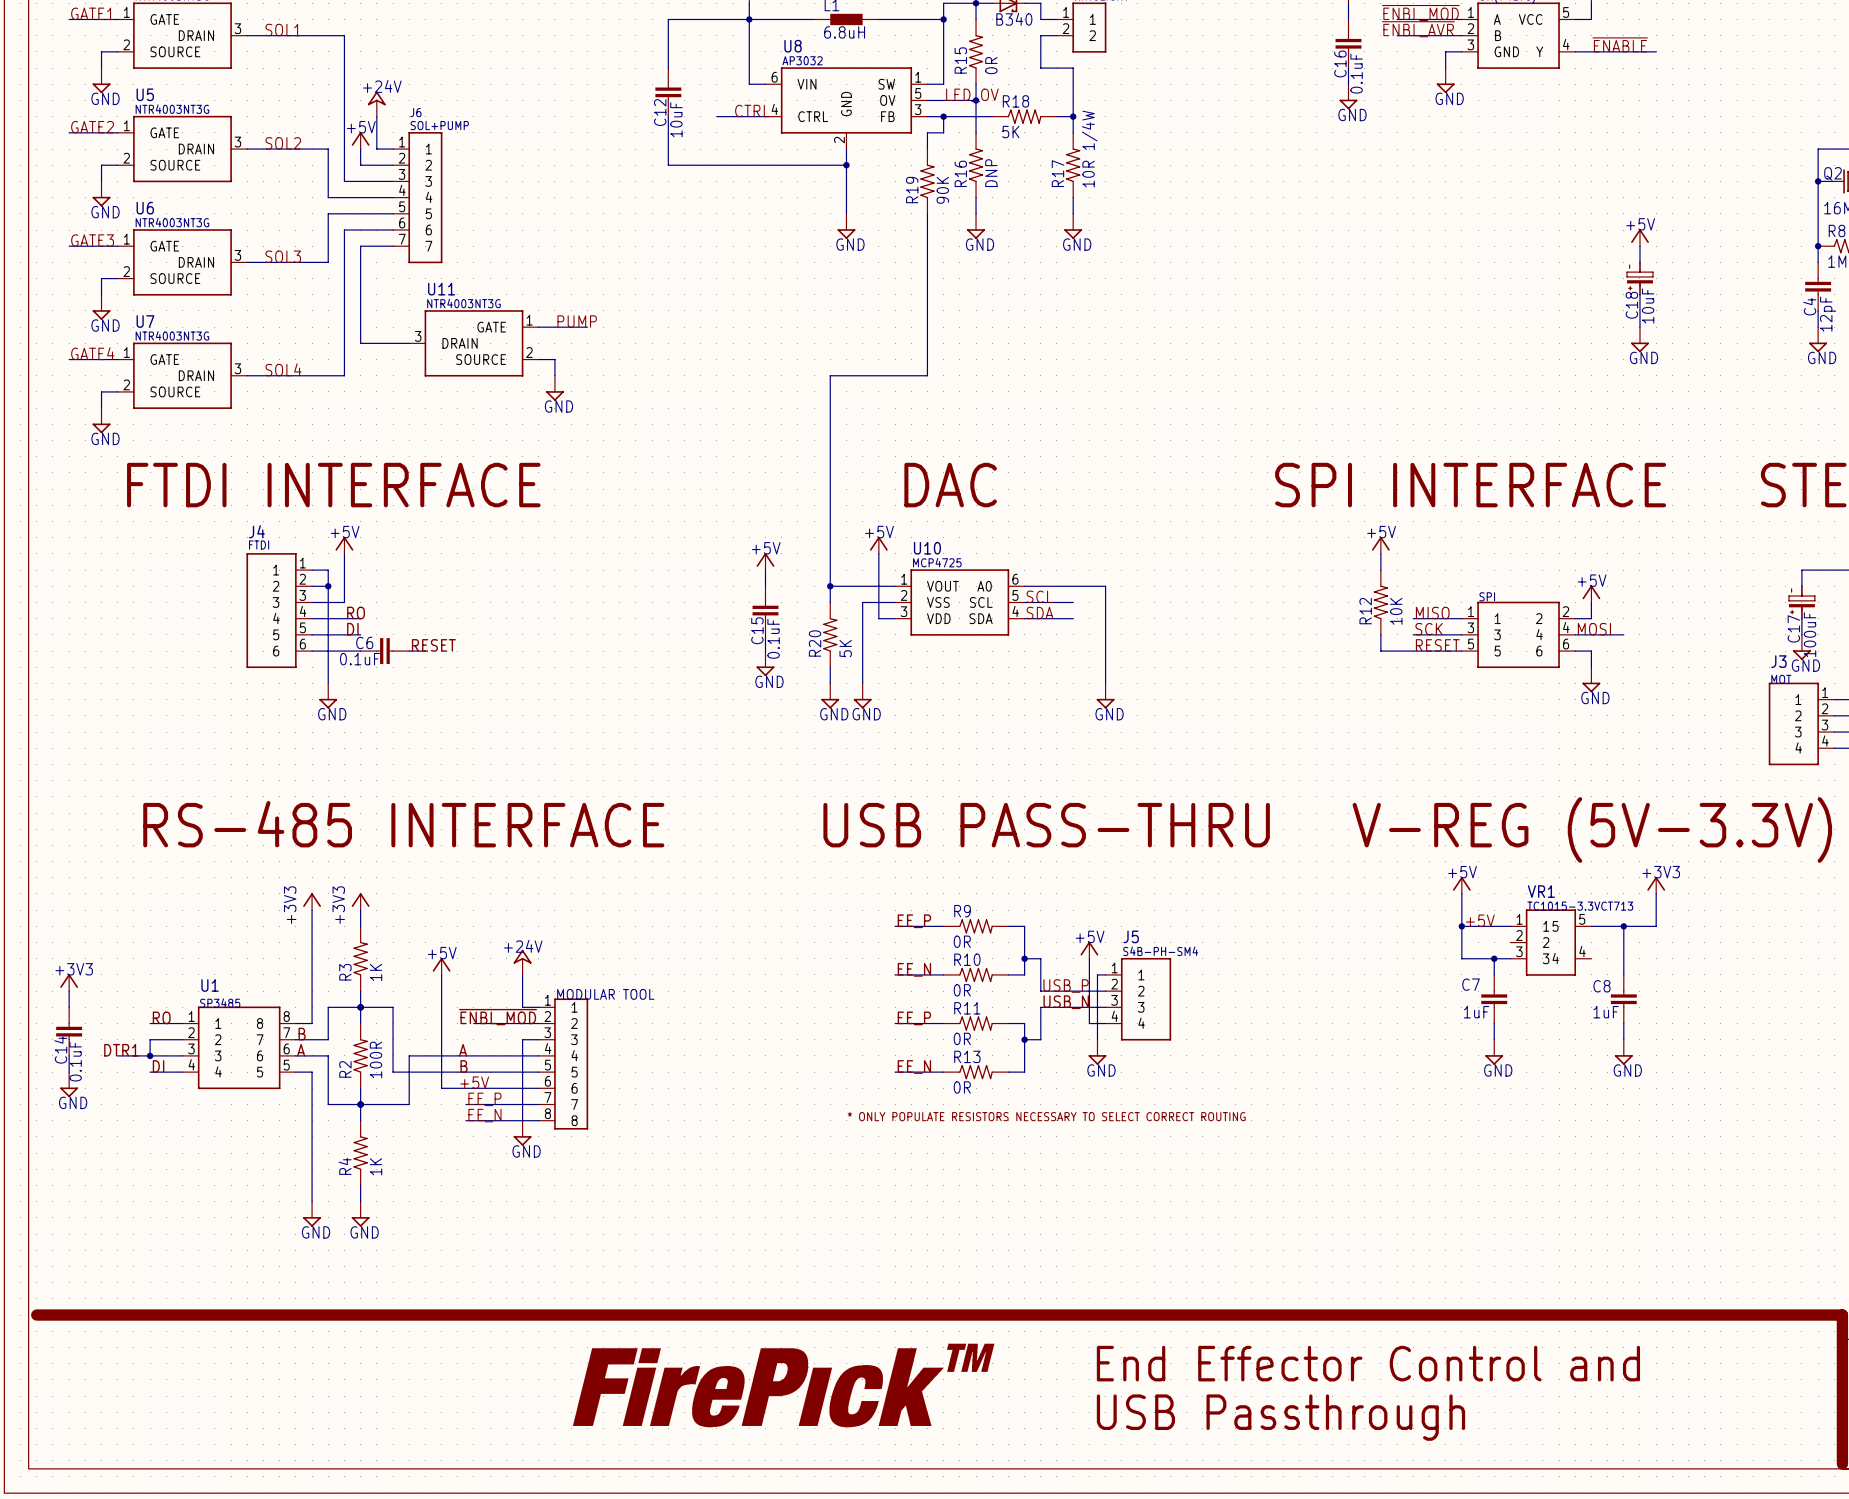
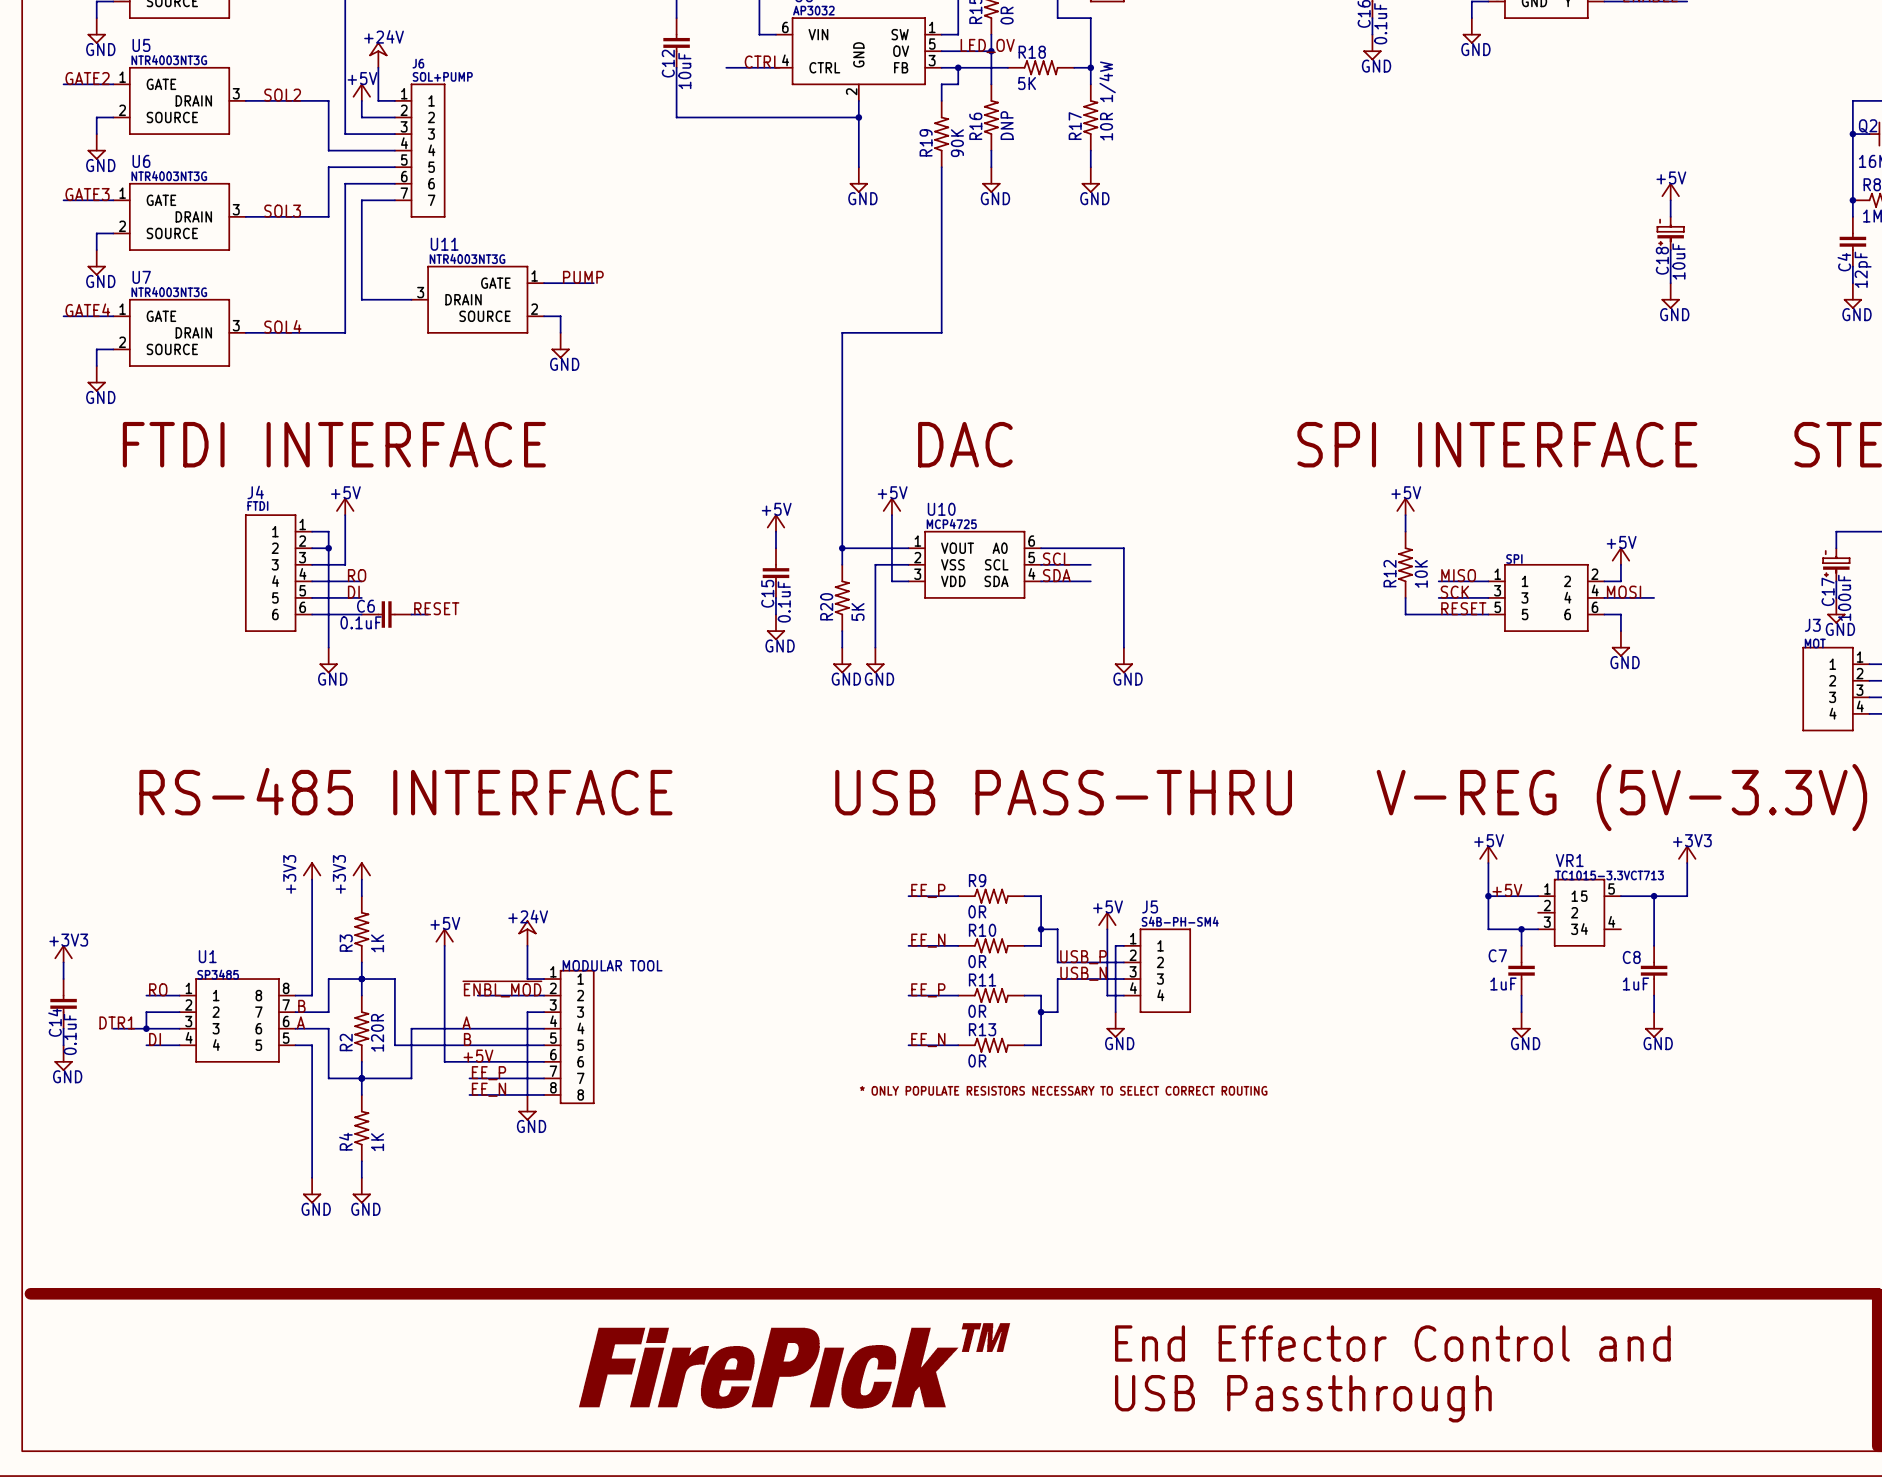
R2 value: 100R (376, 1059) -> 120R (377, 1032)

